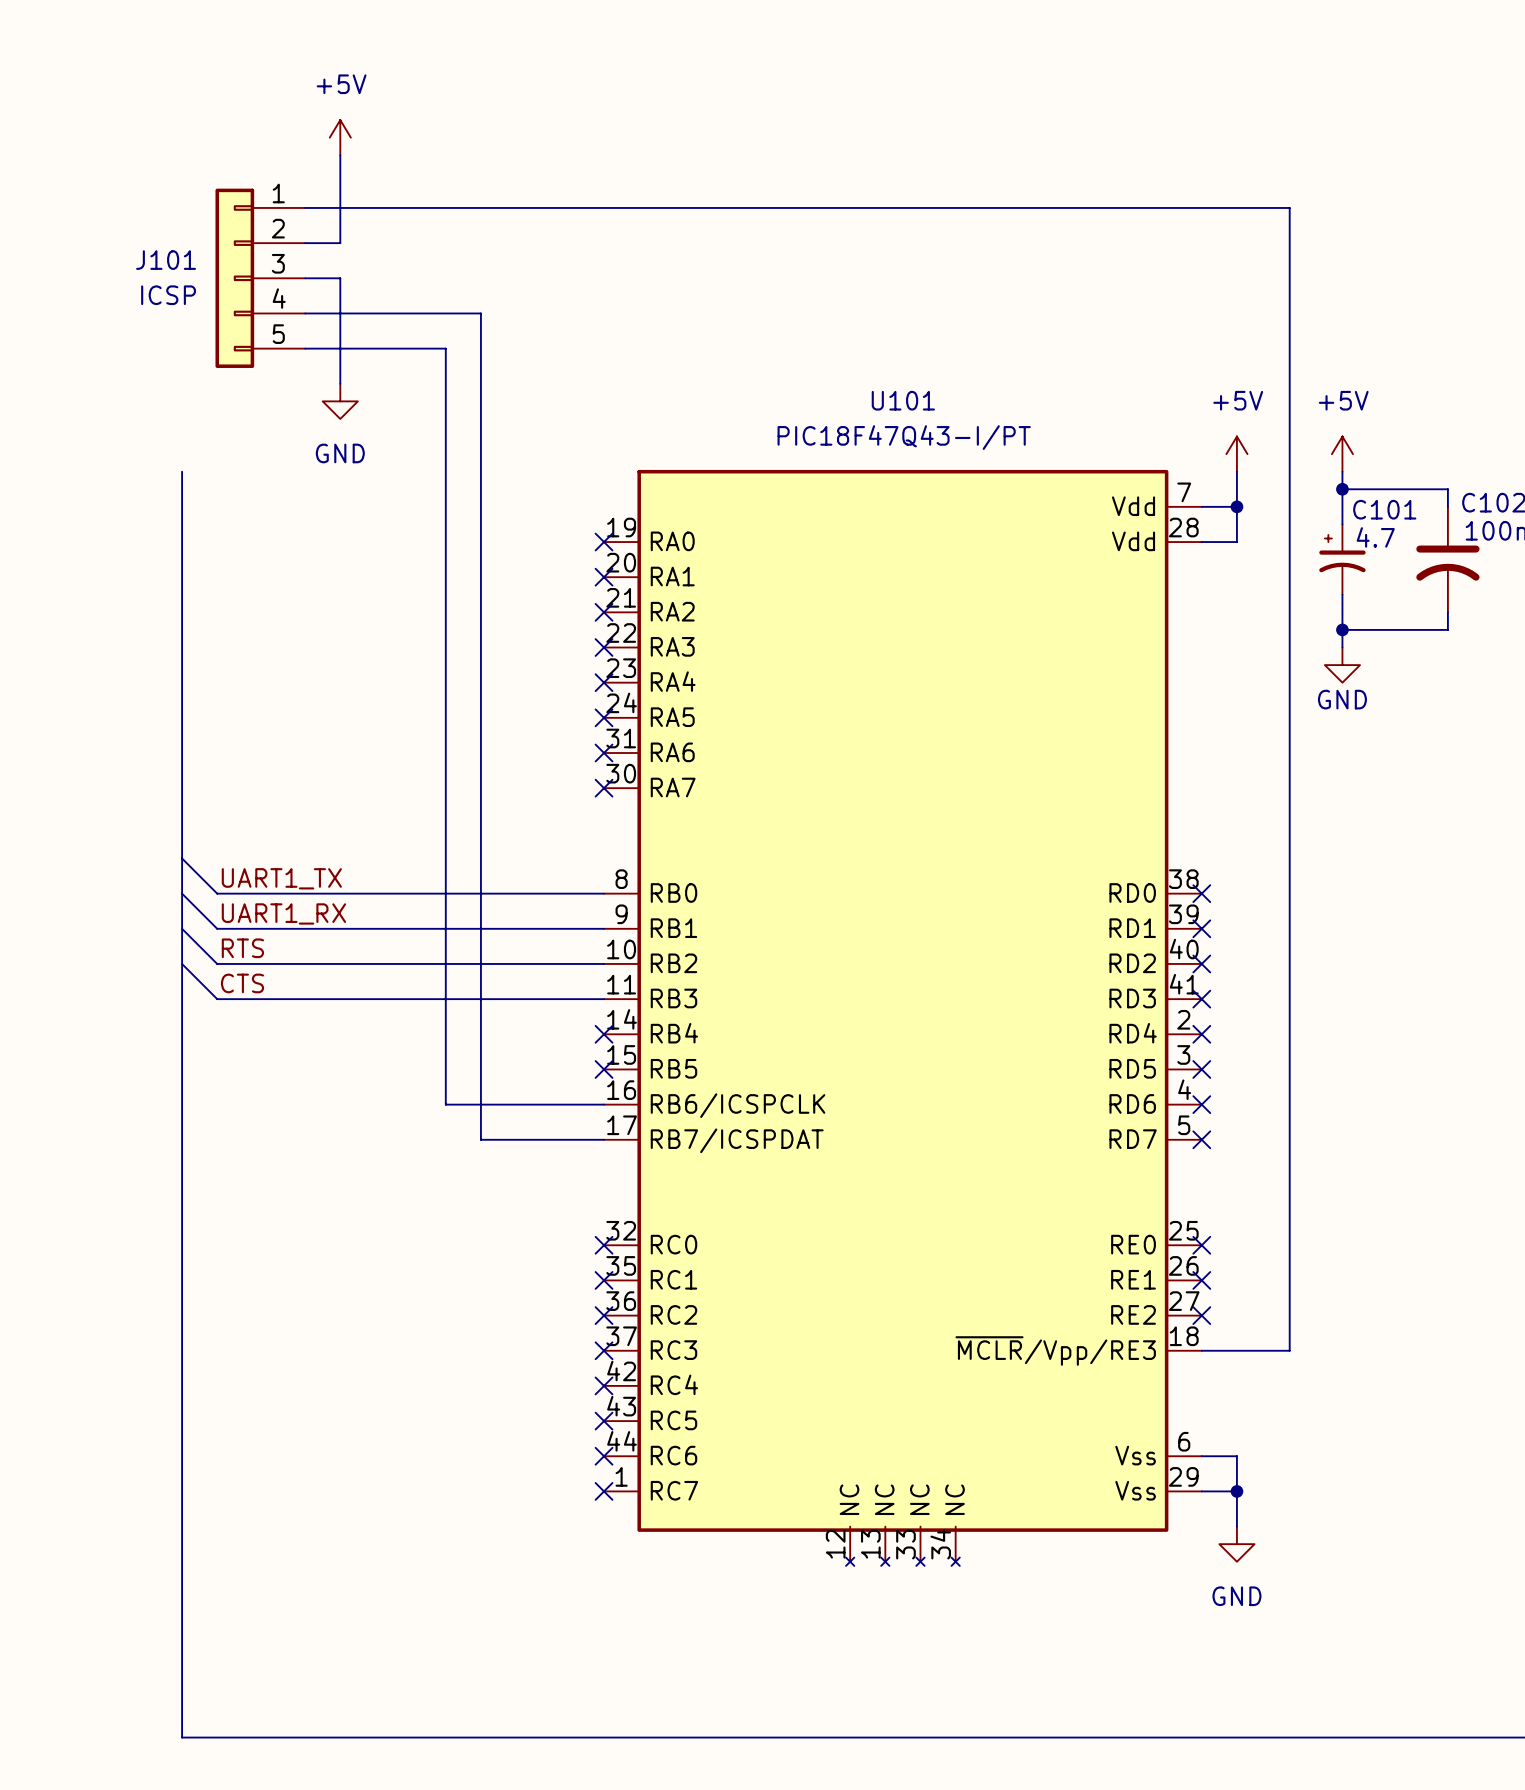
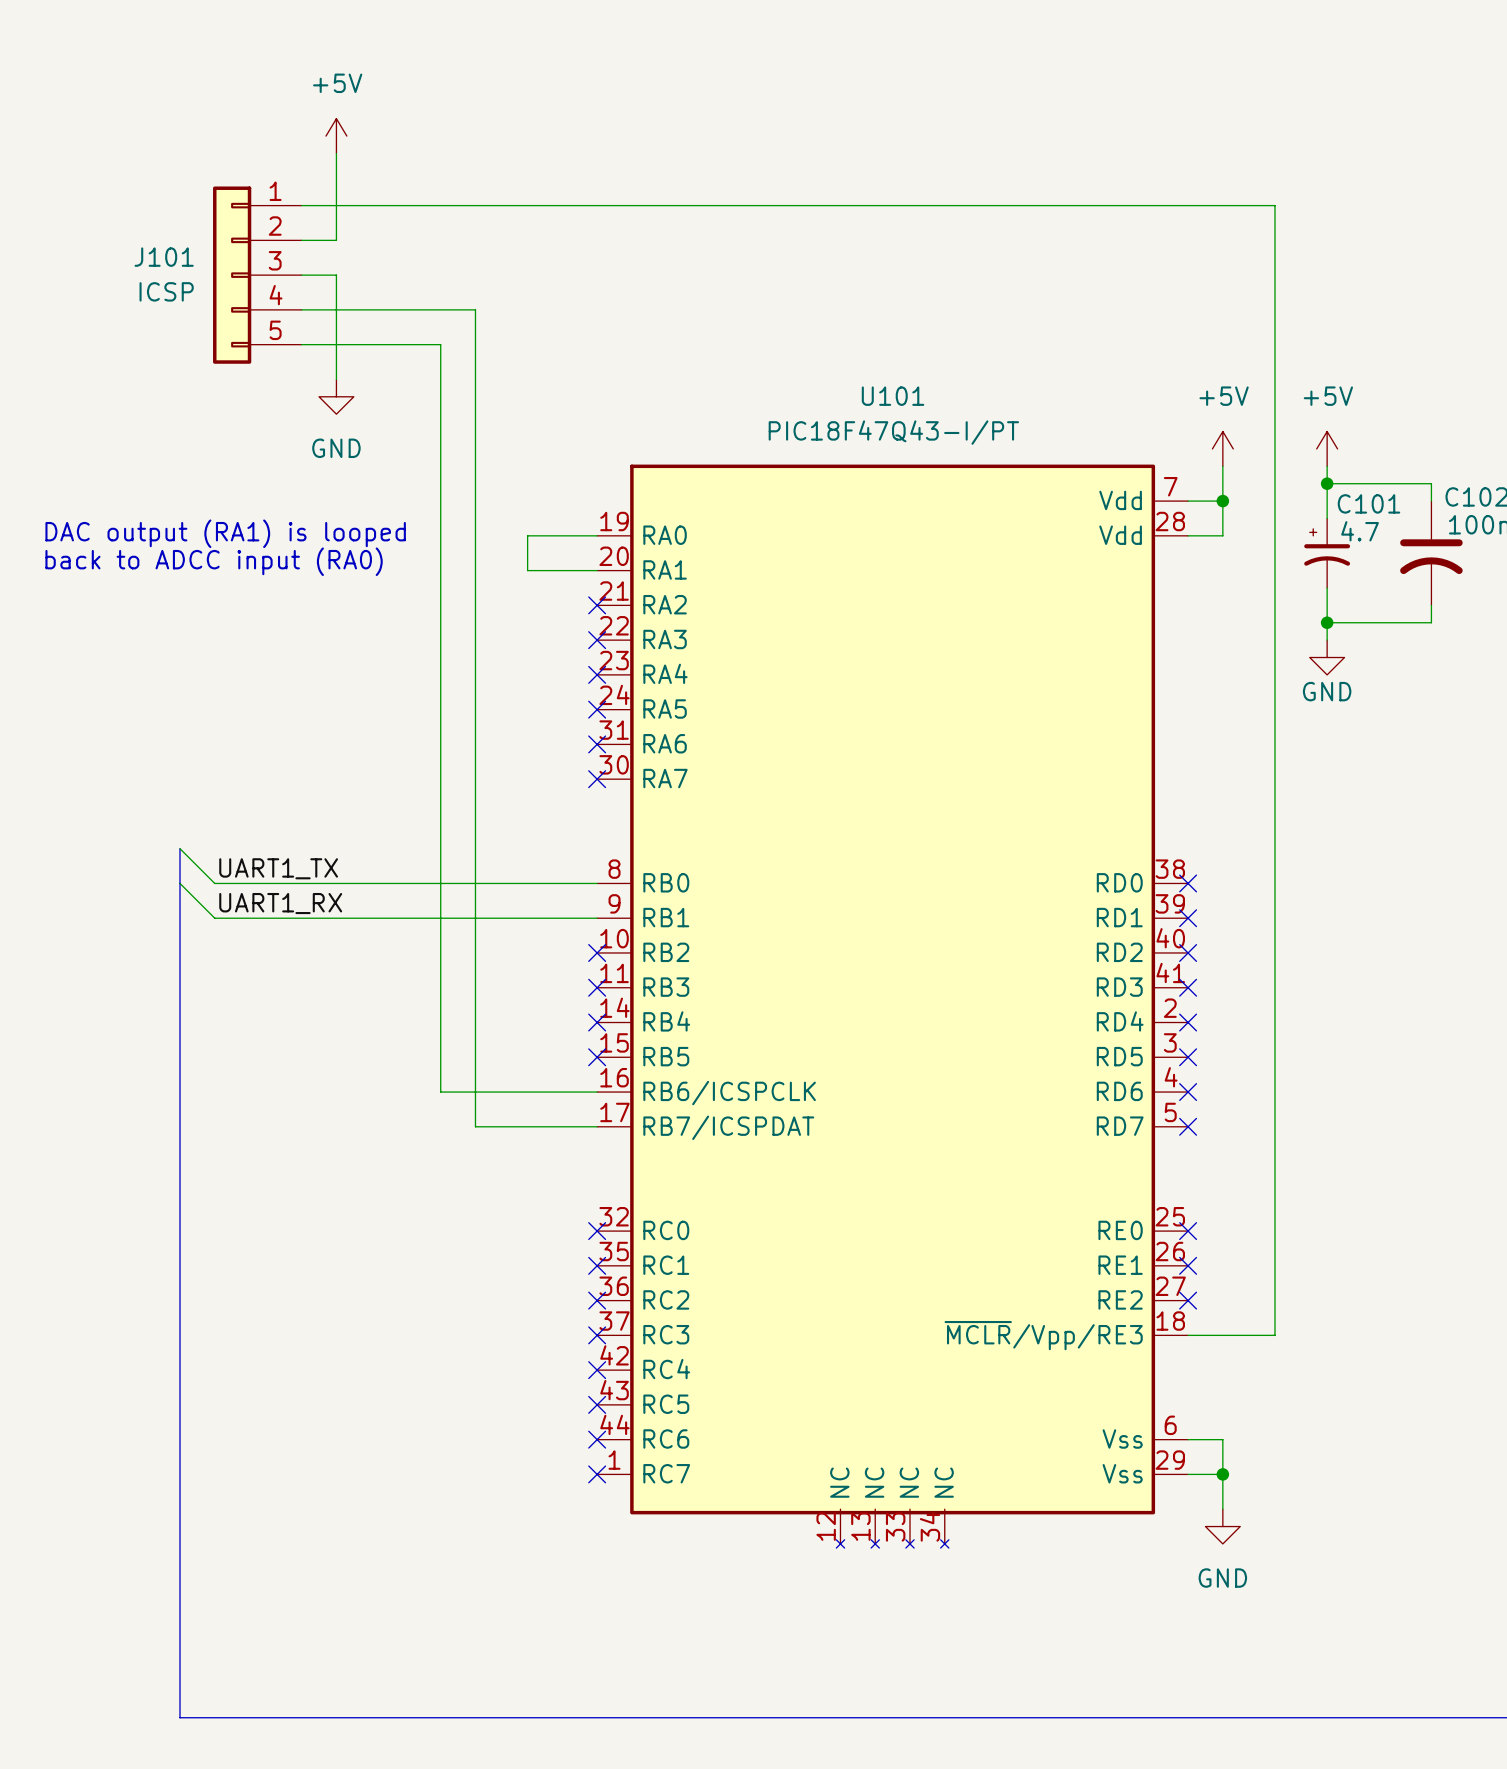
bus: (182, 471) (182, 858) -> none
text: none -> DAC output (RA1) is looped (225, 533)
wire: none -> (597, 535) (527, 535) (527, 570) (597, 570)
no-connect mark: (604, 542) -> none
text: none -> back to ADCC input (RA0) (214, 561)
no-connect mark: (604, 577) -> none
wire: (182, 928) (217, 963) (604, 963) -> none
label: RTS (242, 948) -> none
wire: (182, 963) (217, 999) (604, 999) -> none
no-connect mark: none -> (597, 952)
label: CTS (242, 983) -> none
no-connect mark: none -> (597, 987)

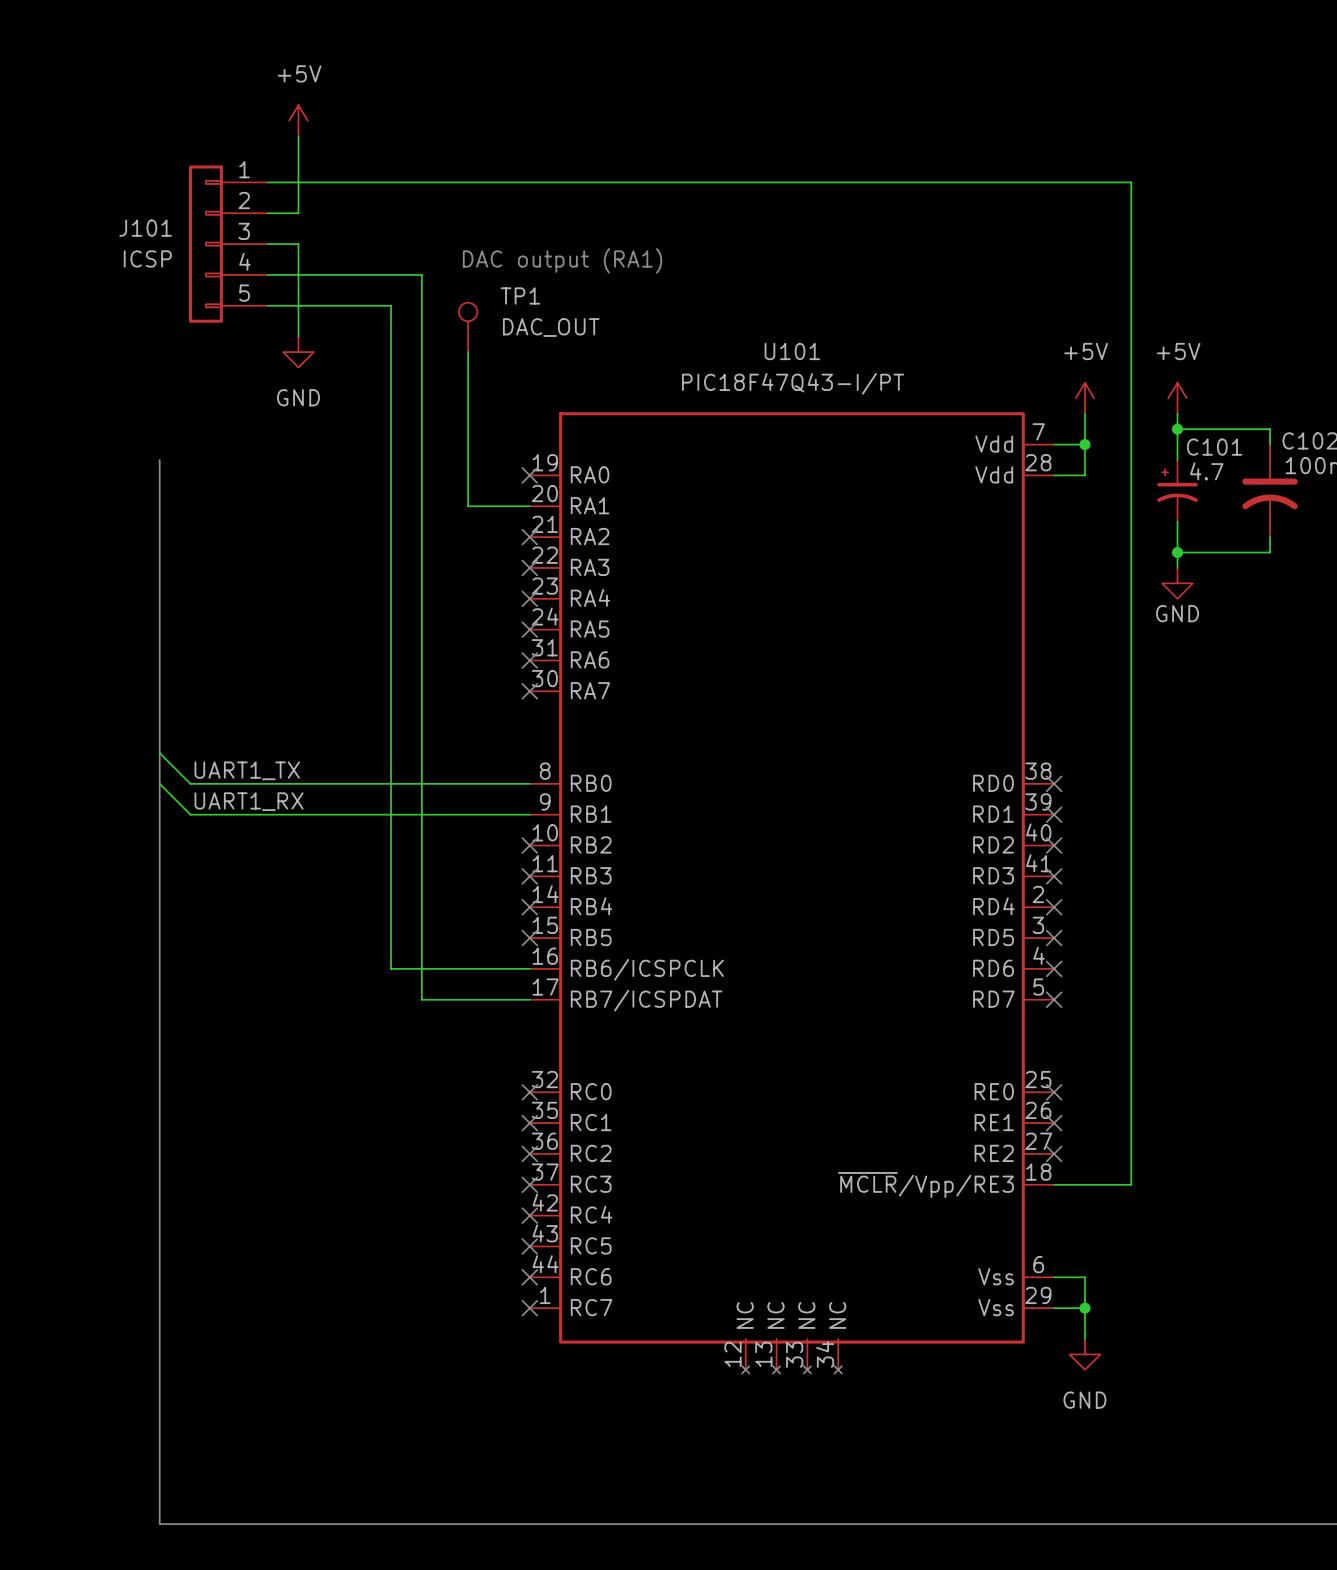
text: none -> DAC output (RA1) (562, 260)
TP1: none -> DAC_OUT (468, 327)
bus: none -> (159, 460) (159, 753)
text: DAC output (RA1) is looped (225, 533) -> none
wire: (527, 535) (597, 535) -> (468, 475) (468, 352)
no-connect mark: none -> (529, 475)
text: back to ADCC input (RA0) (214, 561) -> none

